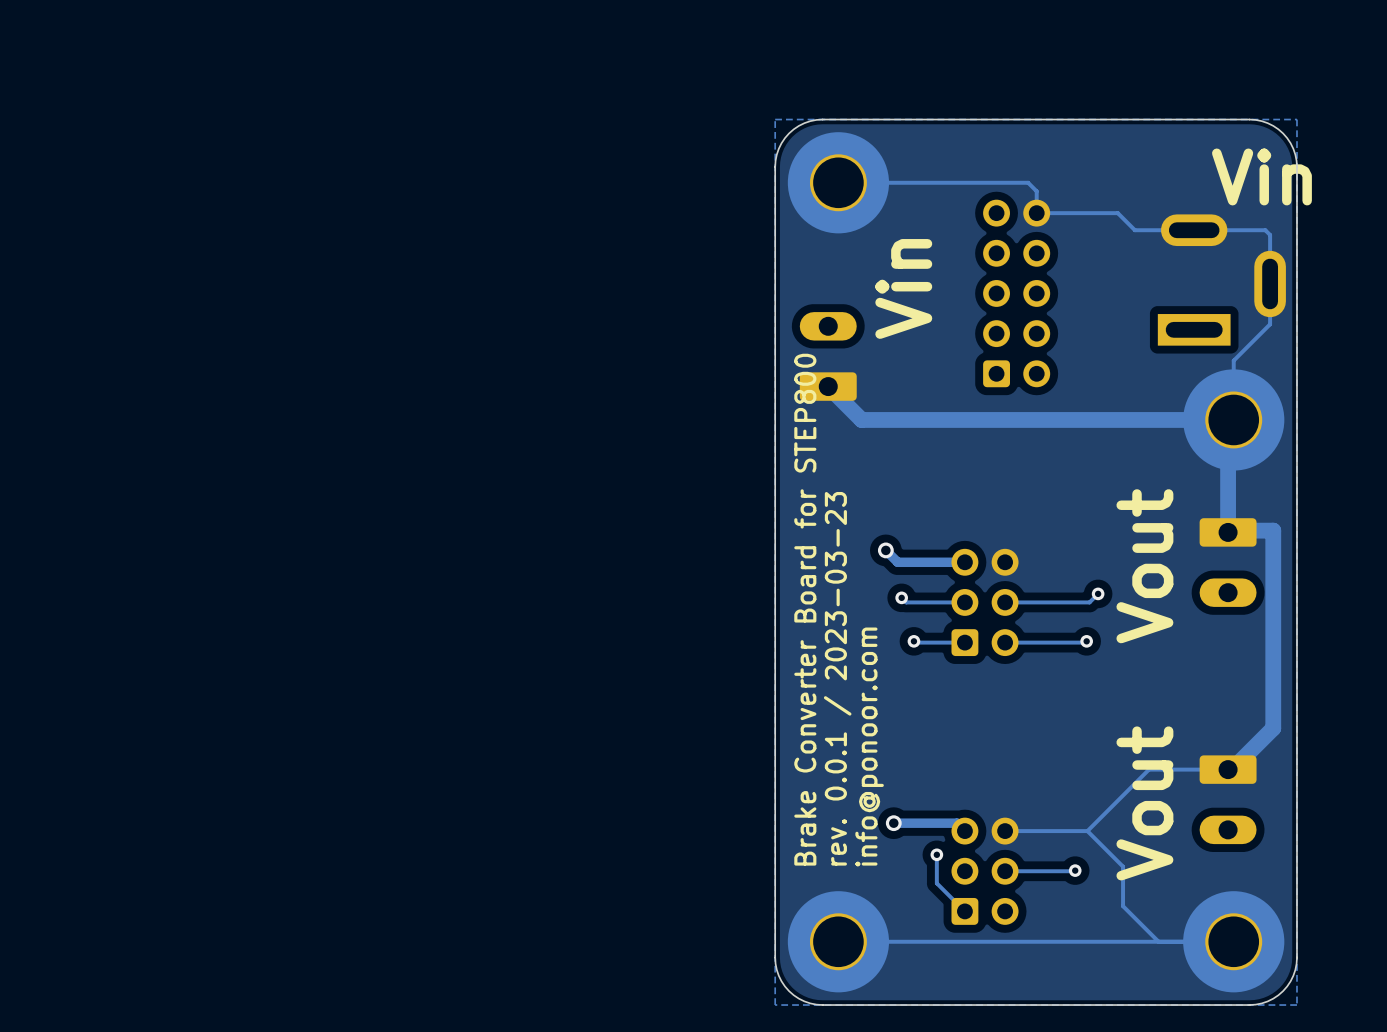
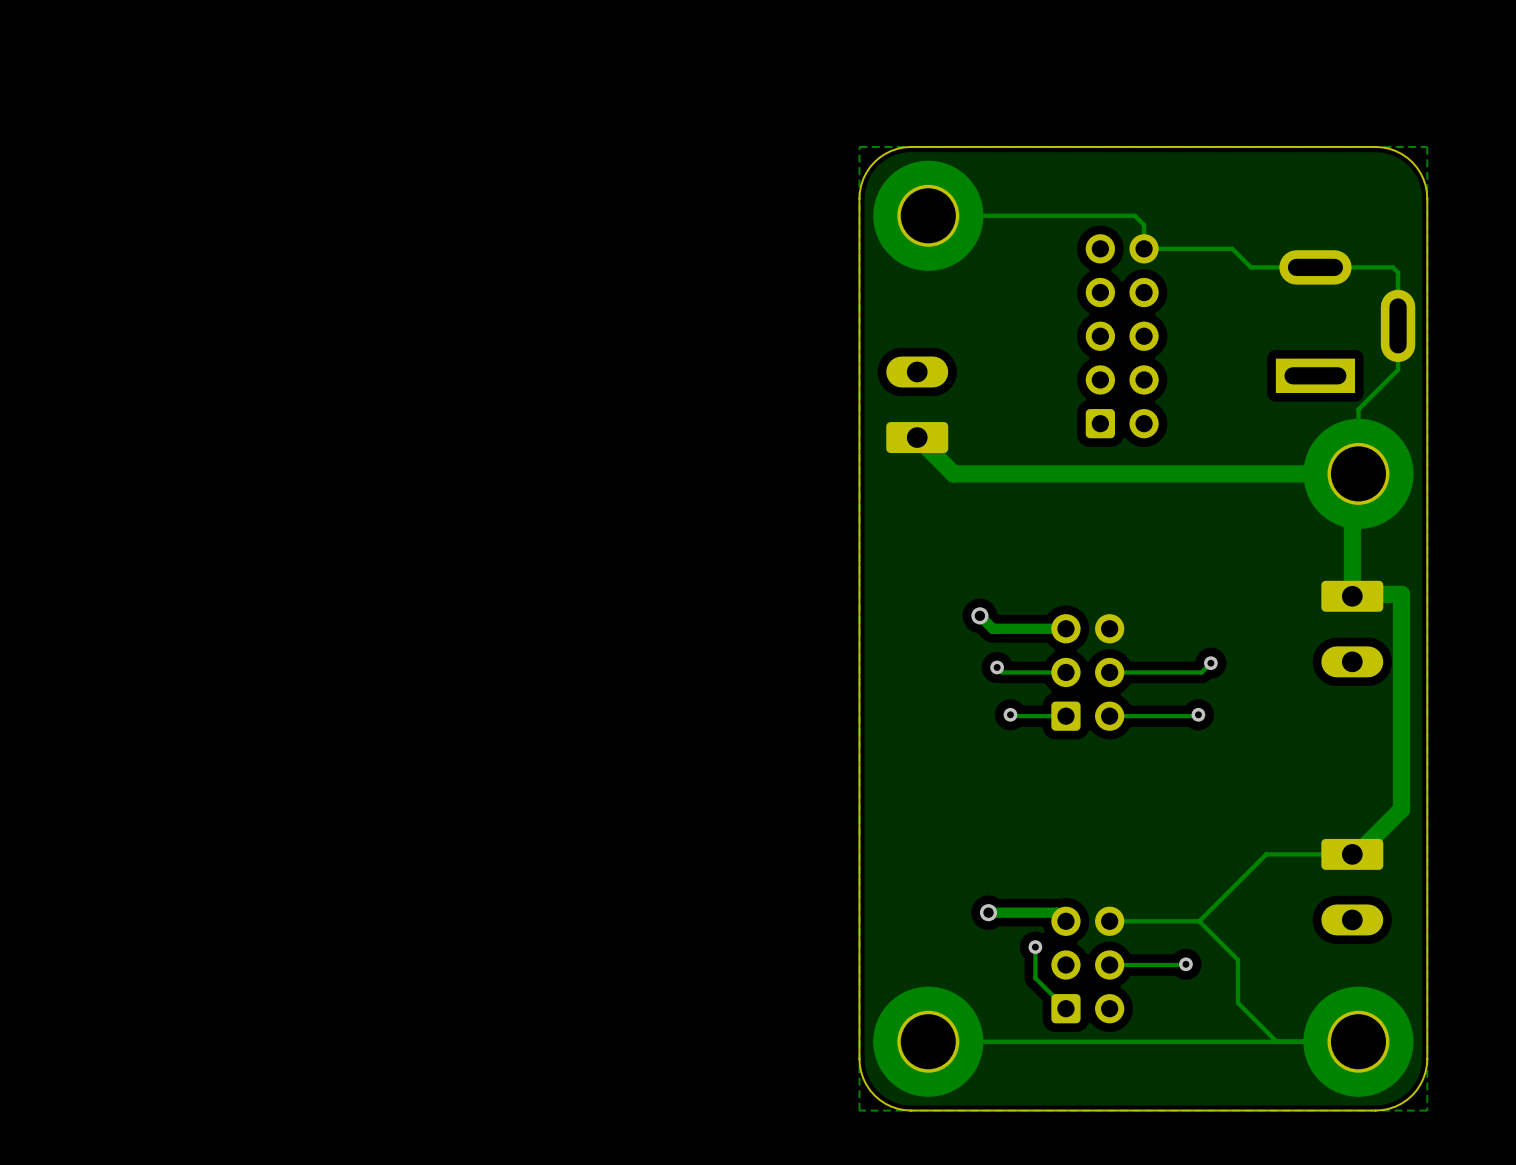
text: Vin (1261, 176) -> none
text: Vin (903, 288) -> none
text: Vout (1144, 566) -> none
text: Brake Converter Board for STEP800 (805, 609) -> none
text: rev. 0.0.1 / 2023-03-23 (837, 678) -> none
text: info@ponoor.com (869, 747) -> none
text: Vout (1144, 803) -> none

